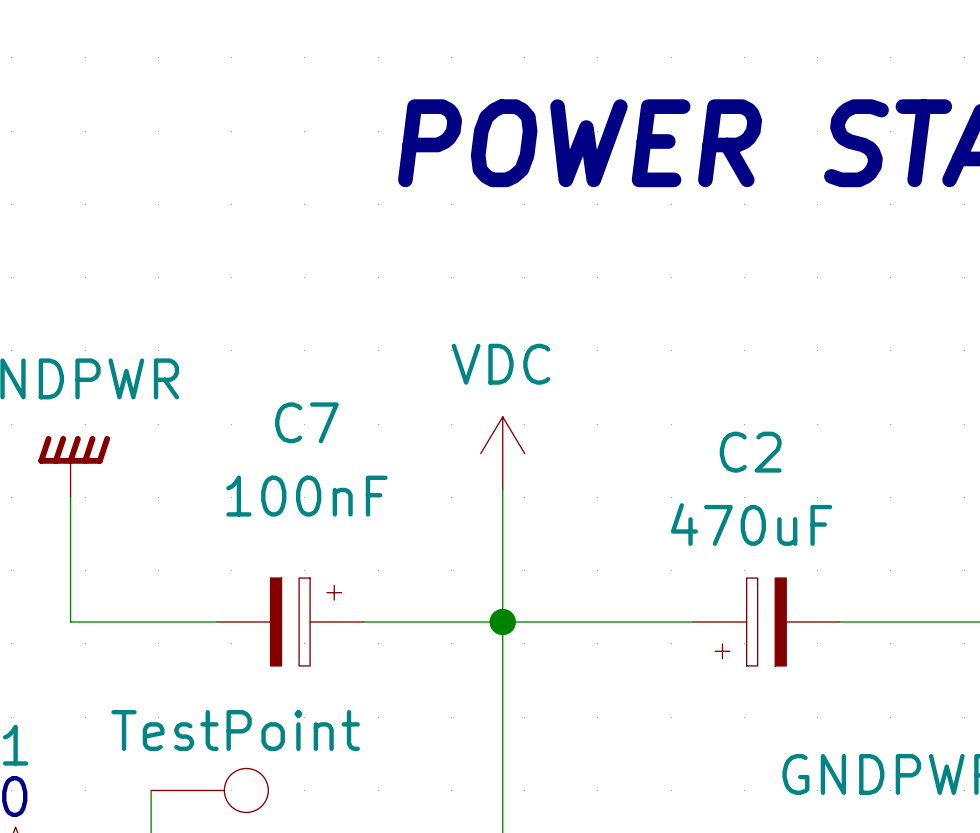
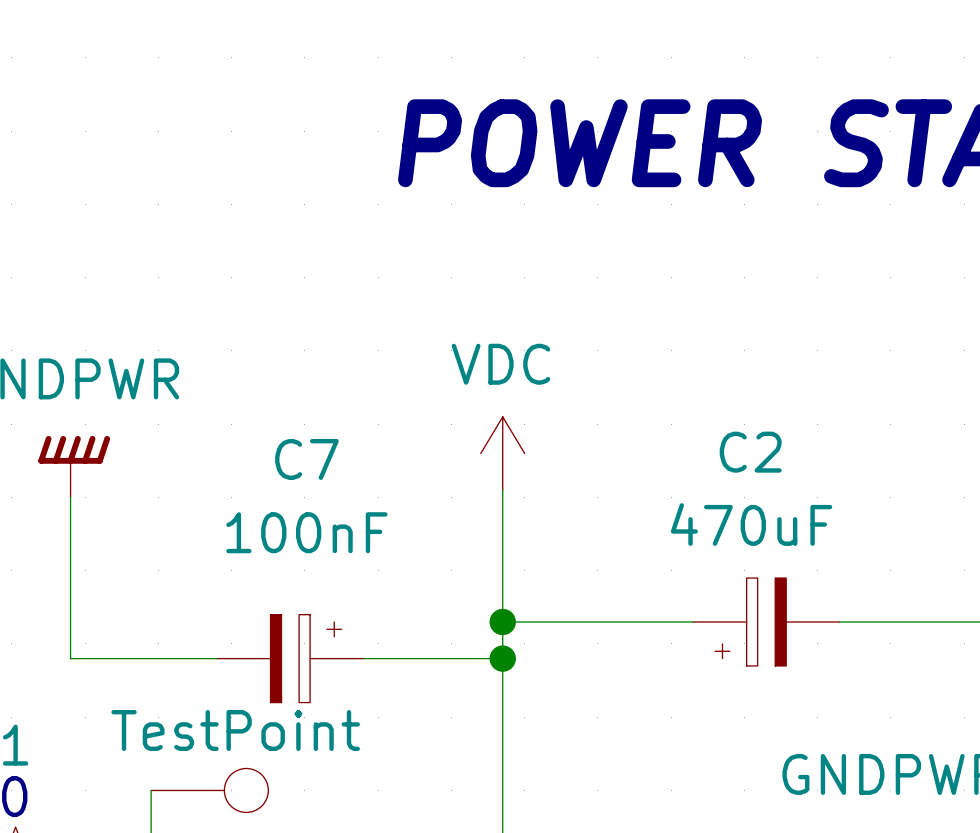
wire: (70, 621) (217, 621) -> (70, 621) (70, 658) (217, 658)
C7 position: (290, 621) -> (290, 658)
wire: (363, 621) (502, 621) -> (363, 658) (502, 658)
junction: none -> (502, 658)

